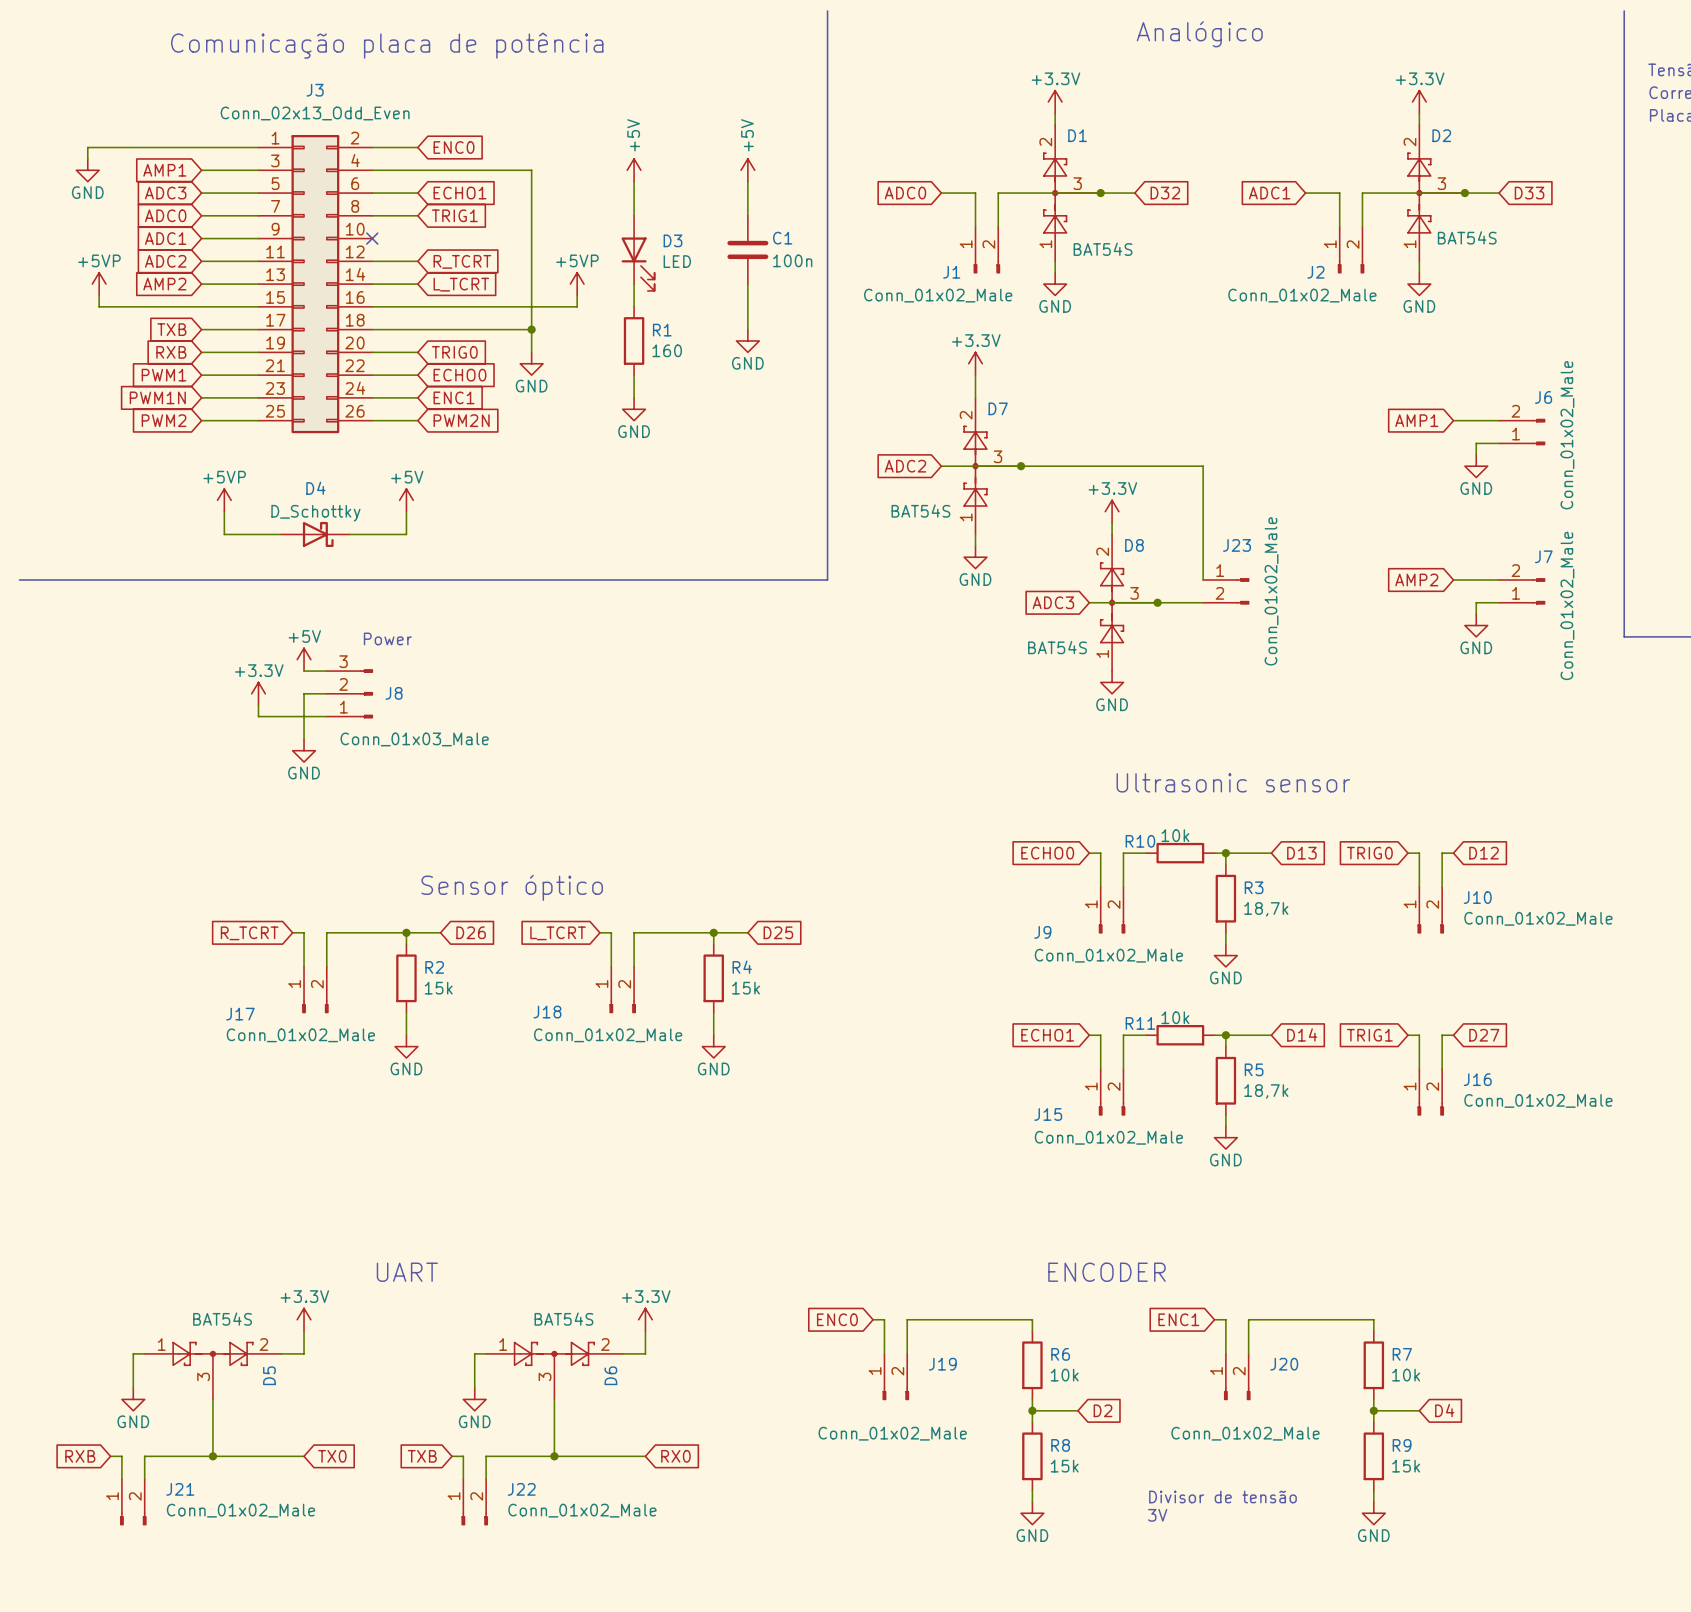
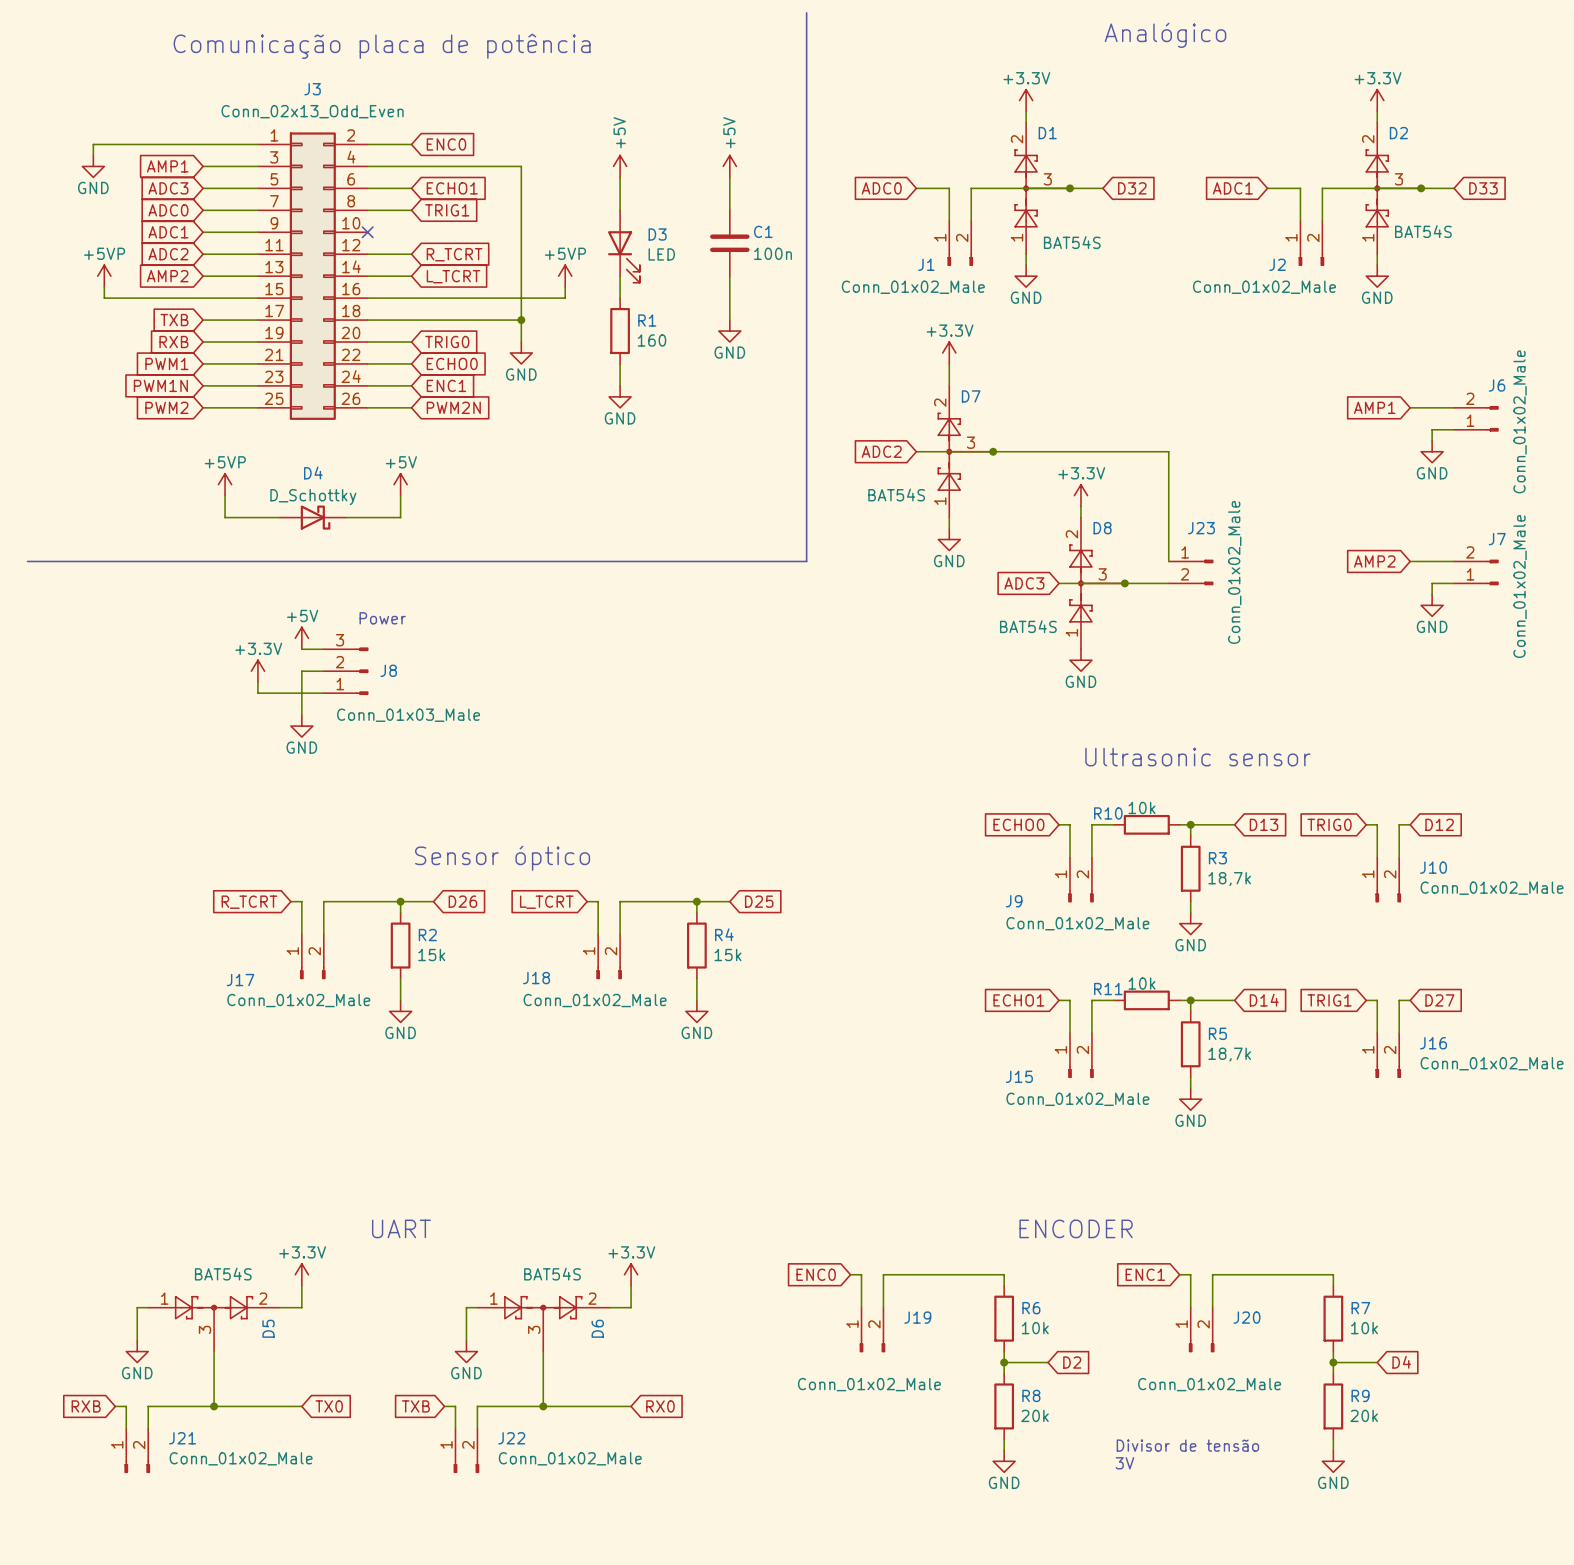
R8 value: 15k (1064, 1466) -> 20k (1035, 1415)
R9 value: 15k (1406, 1466) -> 20k (1364, 1415)

